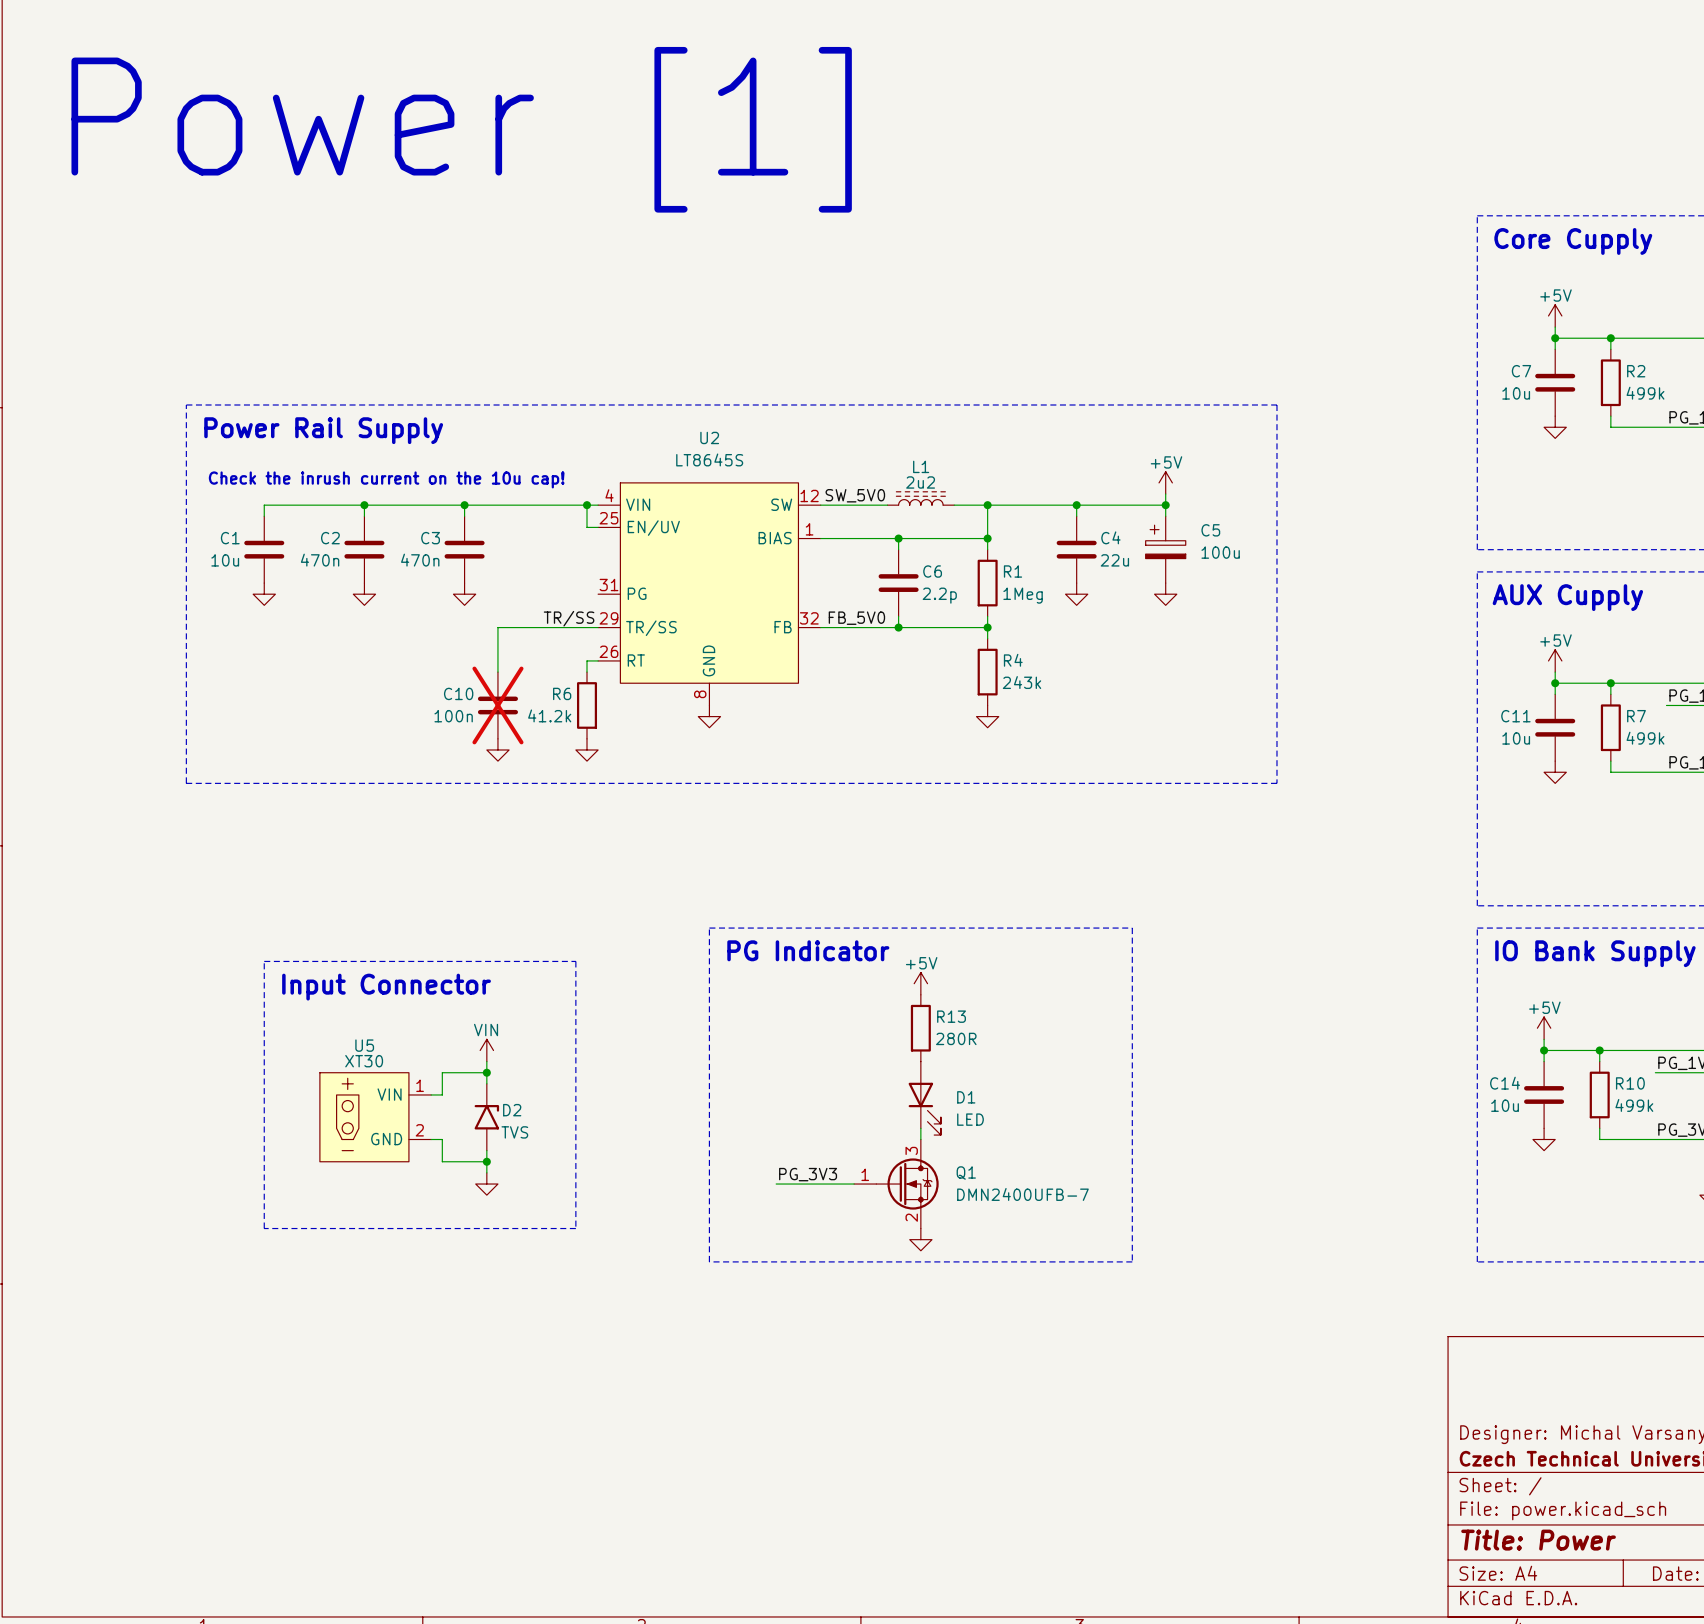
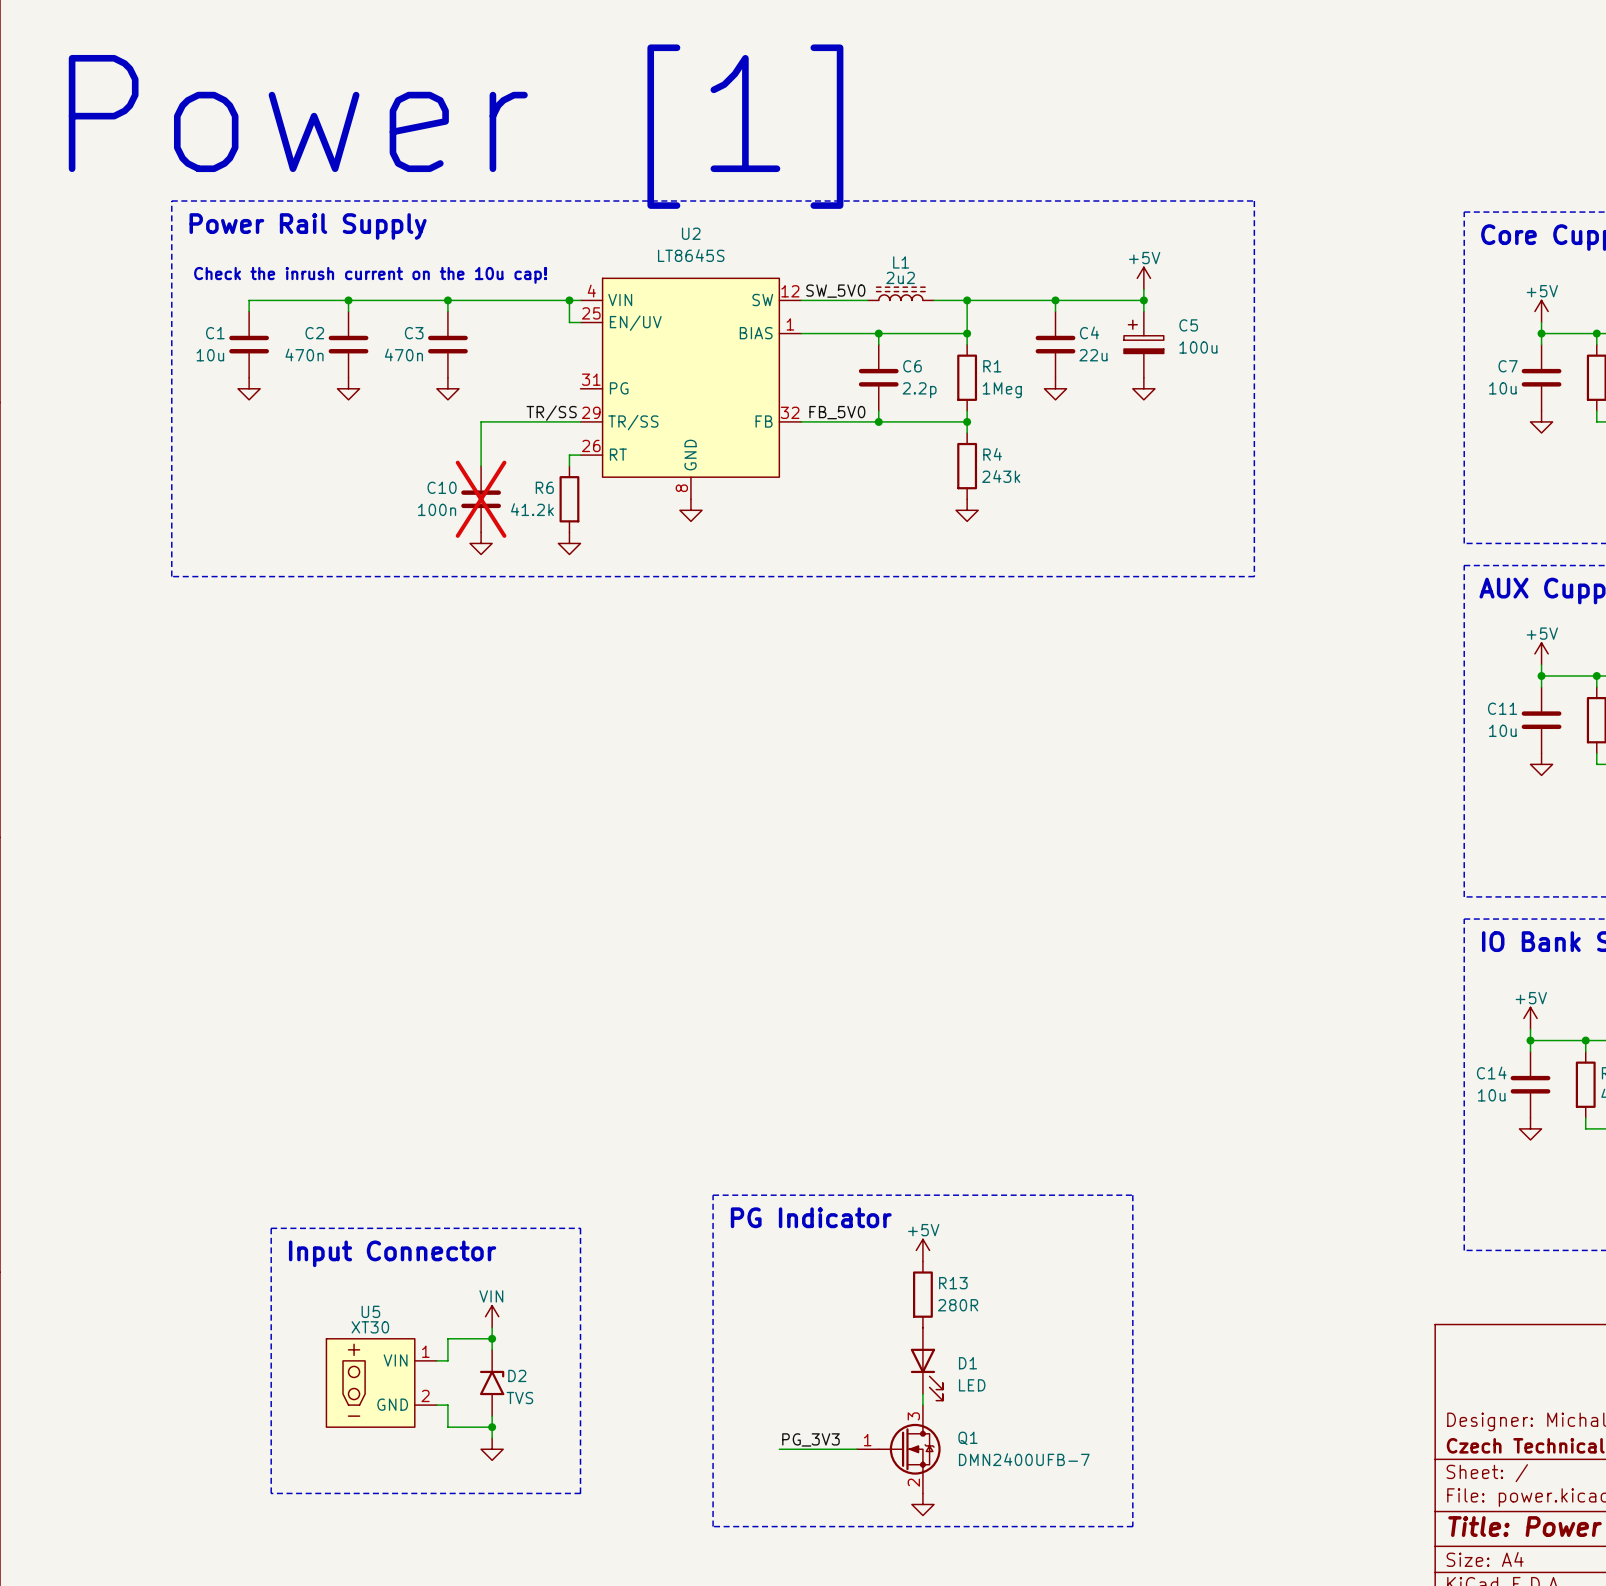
junction: none -> (348, 300)
junction: none -> (447, 300)
junction: none -> (569, 300)
junction: none -> (967, 300)
junction: none -> (1055, 300)
junction: none -> (1143, 300)
junction: none -> (878, 333)
junction: none -> (967, 333)
power symbol: none -> (249, 388)
power symbol: none -> (348, 388)
power symbol: none -> (447, 388)
power symbol: none -> (1055, 388)
power symbol: none -> (1143, 388)
line: (186, 405) (1276, 405) (1276, 783) (186, 783) (186, 405) -> (171, 201) (1254, 201) (1254, 576) (171, 576) (171, 201)
junction: none -> (878, 421)
junction: none -> (967, 421)
text position: Power Rail Supply (323, 430) -> Power Rail Supply (308, 226)
text position: Check the inrush current on the 10u cap! (386, 479) -> Check the inrush current on the 10u cap! (370, 275)
power symbol position: +5V (1165, 482) -> +5V (1143, 278)
wire: (1165, 494) (1165, 516) -> (1143, 289) (1143, 311)
label position: SW_5V0 (855, 495) -> SW_5V0 (835, 291)
L1 position: (920, 498) -> (900, 293)
wire: (364, 505) (364, 516) -> (348, 300) (348, 311)
junction: (364, 505) -> none
wire: (464, 505) (464, 516) -> (447, 300) (447, 311)
junction: (464, 505) -> none
wire: (587, 505) (587, 527) (598, 527) -> (569, 300) (569, 322) (580, 322)
junction: (587, 505) -> none
wire: (598, 505) (264, 505) (264, 516) -> (580, 300) (249, 300) (249, 311)
wire: (820, 505) (887, 505) -> (801, 300) (867, 300)
wire: (954, 505) (1165, 505) -> (933, 300) (1143, 300)
wire: (987, 505) (987, 549) -> (967, 300) (967, 344)
junction: (987, 505) -> none
wire: (1076, 505) (1076, 516) -> (1055, 300) (1055, 311)
junction: (1076, 505) -> none
junction: (1165, 505) -> none
power symbol: none -> (690, 510)
power symbol: none -> (967, 510)
wire: (820, 538) (987, 538) -> (801, 333) (967, 333)
wire: (898, 538) (898, 549) -> (878, 333) (878, 344)
junction: (898, 538) -> none
junction: (987, 538) -> none
C1 position: (264, 549) -> (249, 344)
C2 position: (364, 549) -> (348, 344)
C3 position: (464, 549) -> (447, 344)
power symbol: none -> (569, 543)
C4 position: (1076, 549) -> (1055, 344)
C5 position: (1165, 549) -> (1143, 344)
C6 position: (898, 583) -> (878, 377)
R1 position: (987, 583) -> (967, 377)
power symbol: (264, 594) -> none
power symbol: (364, 594) -> none
power symbol position: (464, 594) -> (481, 543)
U2 position: (709, 594) -> (690, 388)
power symbol: (1076, 594) -> none
power symbol: (1165, 594) -> none
wire: (898, 616) (898, 627) -> (878, 410) (878, 421)
wire: (987, 616) (987, 638) -> (967, 410) (967, 432)
label position: TR/SS (569, 618) -> TR/SS (551, 413)
label position: FB_5V0 (856, 618) -> FB_5V0 (837, 412)
wire: (598, 627) (497, 627) (497, 672) -> (580, 421) (481, 421) (481, 466)
wire: (820, 627) (987, 627) -> (801, 421) (967, 421)
junction: (898, 627) -> none
junction: (987, 627) -> none
wire: (598, 660) (587, 660) (587, 672) -> (580, 455) (569, 455) (569, 466)
R4 position: (987, 672) -> (967, 466)
C10 position: (497, 705) -> (481, 499)
R6 position: (587, 705) -> (569, 499)
power symbol: (709, 716) -> none
power symbol: (987, 716) -> none
power symbol: (497, 749) -> none
power symbol: (587, 749) -> none
line: (709, 928) (1132, 928) (1132, 1261) (709, 1261) (709, 928) -> none
text: PG Indicator (808, 950) -> none
line: (264, 961) (575, 961) (575, 1228) (264, 1228) (264, 961) -> none
power symbol: +5V (920, 983) -> none
text: Input Connector (386, 987) -> none
R13 position: (920, 1028) -> (922, 1294)
power symbol: VIN (486, 1050) -> none
wire: (486, 1061) (486, 1083) -> none
wire: (486, 1072) (442, 1072) (442, 1094) (431, 1094) -> none
junction: (486, 1072) -> none
D1 position: (924, 1098) -> (926, 1364)
U5 position: (375, 1117) -> (381, 1382)
D2 position: (486, 1117) -> (492, 1382)
wire: (920, 1128) (920, 1139) -> none
wire: (431, 1139) (442, 1139) (442, 1161) (486, 1161) -> none
wire: (486, 1150) (486, 1172) -> (492, 1327) (492, 1349)
junction: (486, 1161) -> none
label: PG_3V3 (808, 1174) -> none
power symbol: (486, 1184) -> none
wire: (776, 1184) (854, 1184) -> none
Q1 position: (896, 1184) -> (898, 1449)
line: none -> (713, 1195) (1132, 1195) (1132, 1526) (713, 1526) (713, 1195)
text: none -> PG Indicator (811, 1217)
line: none -> (271, 1228) (580, 1228) (580, 1493) (271, 1493) (271, 1228)
power symbol: (920, 1239) -> none
power symbol: none -> +5V (922, 1250)
text: none -> Input Connector (392, 1253)
power symbol: none -> VIN (492, 1316)
wire: none -> (492, 1338) (447, 1338) (447, 1360) (436, 1360)
junction: none -> (492, 1338)
wire: none -> (922, 1394) (922, 1405)
wire: none -> (436, 1405) (447, 1405) (447, 1427) (492, 1427)
wire: none -> (492, 1416) (492, 1438)
junction: none -> (492, 1427)
label: none -> PG_3V3 (810, 1439)
power symbol: none -> (492, 1449)
wire: none -> (779, 1449) (856, 1449)
power symbol: none -> (922, 1504)

